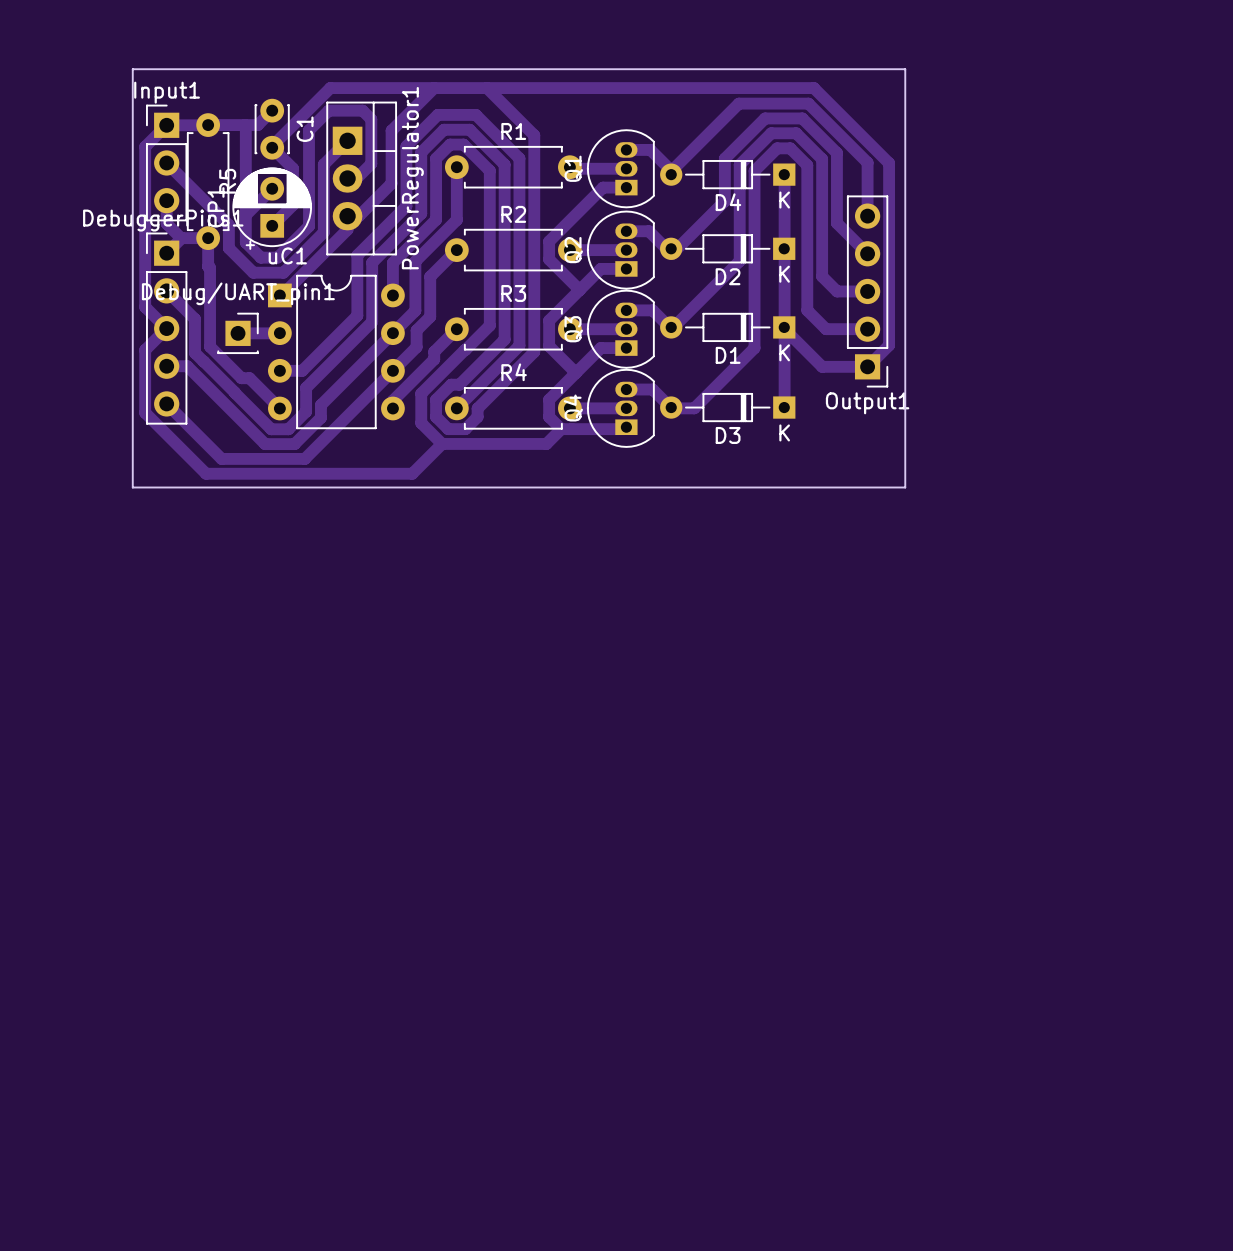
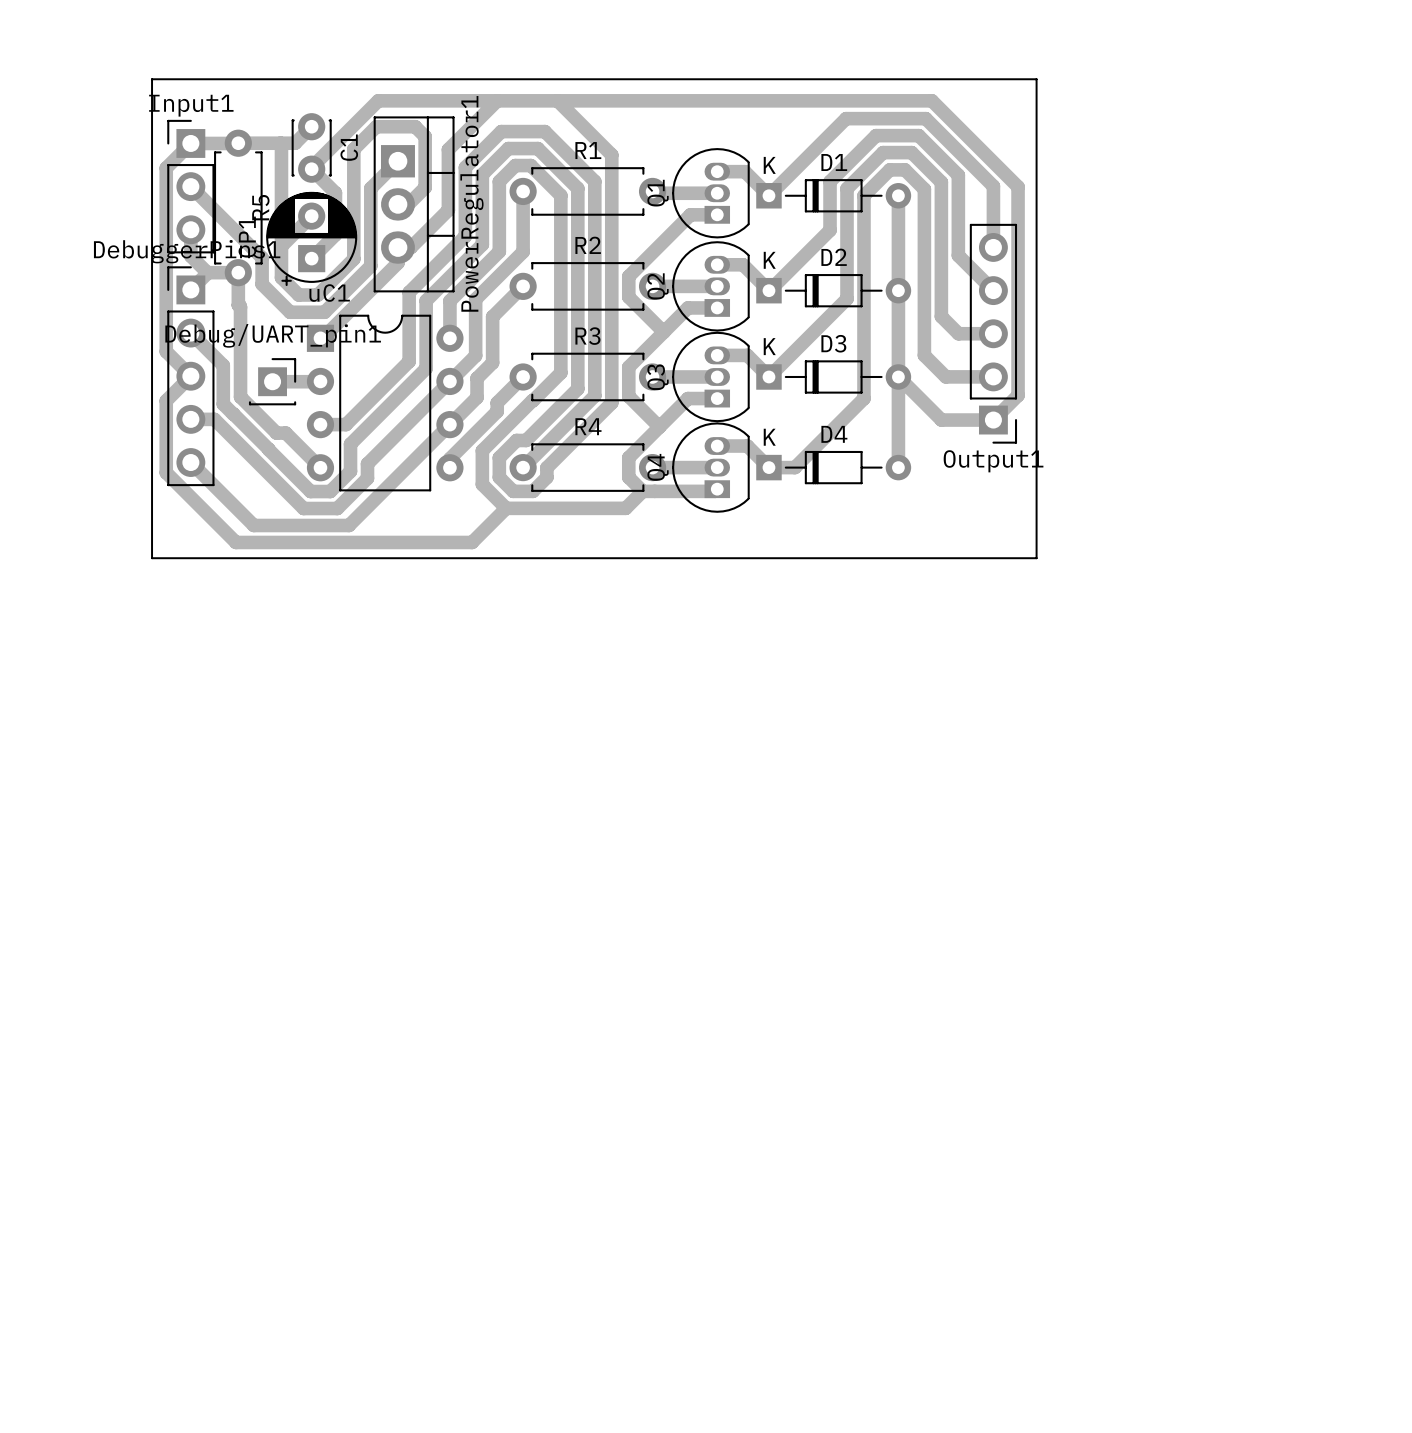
D4 rotation: 0° (727, 174) -> 180° (833, 467)
D4 position: (727, 174) -> (833, 467)
D2 rotation: 0° (727, 248) -> 180° (833, 290)
D1 rotation: 0° (727, 327) -> 180° (833, 195)
D1 position: (727, 327) -> (833, 195)
D3 rotation: 0° (727, 407) -> 180° (833, 376)

